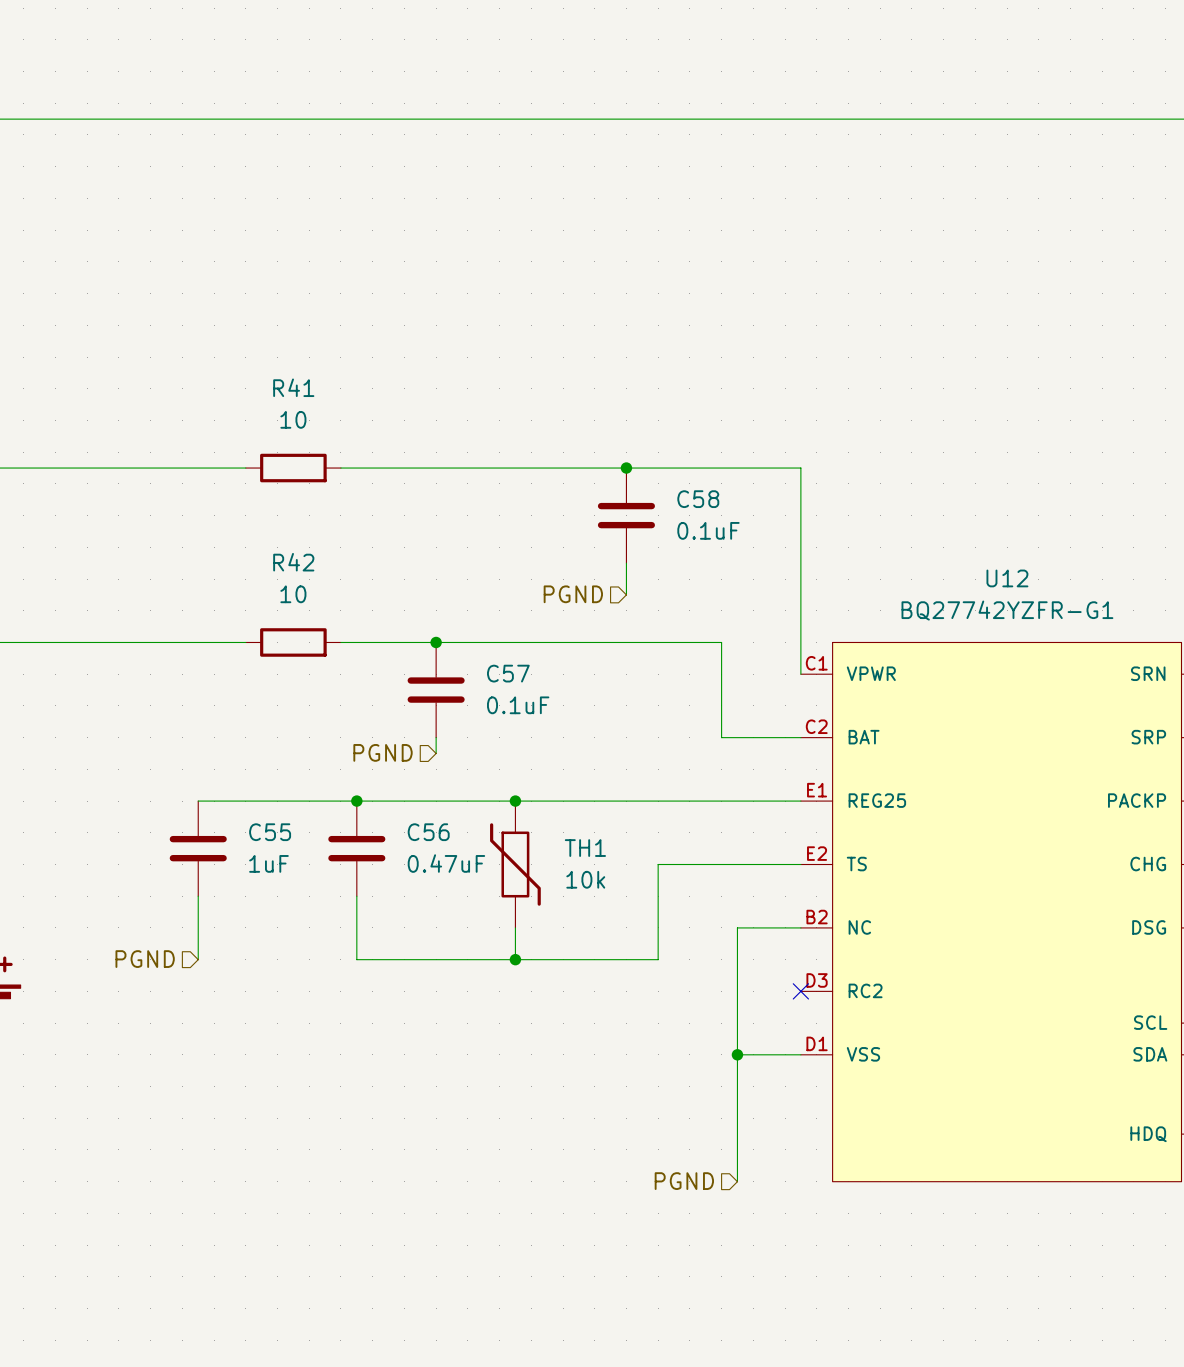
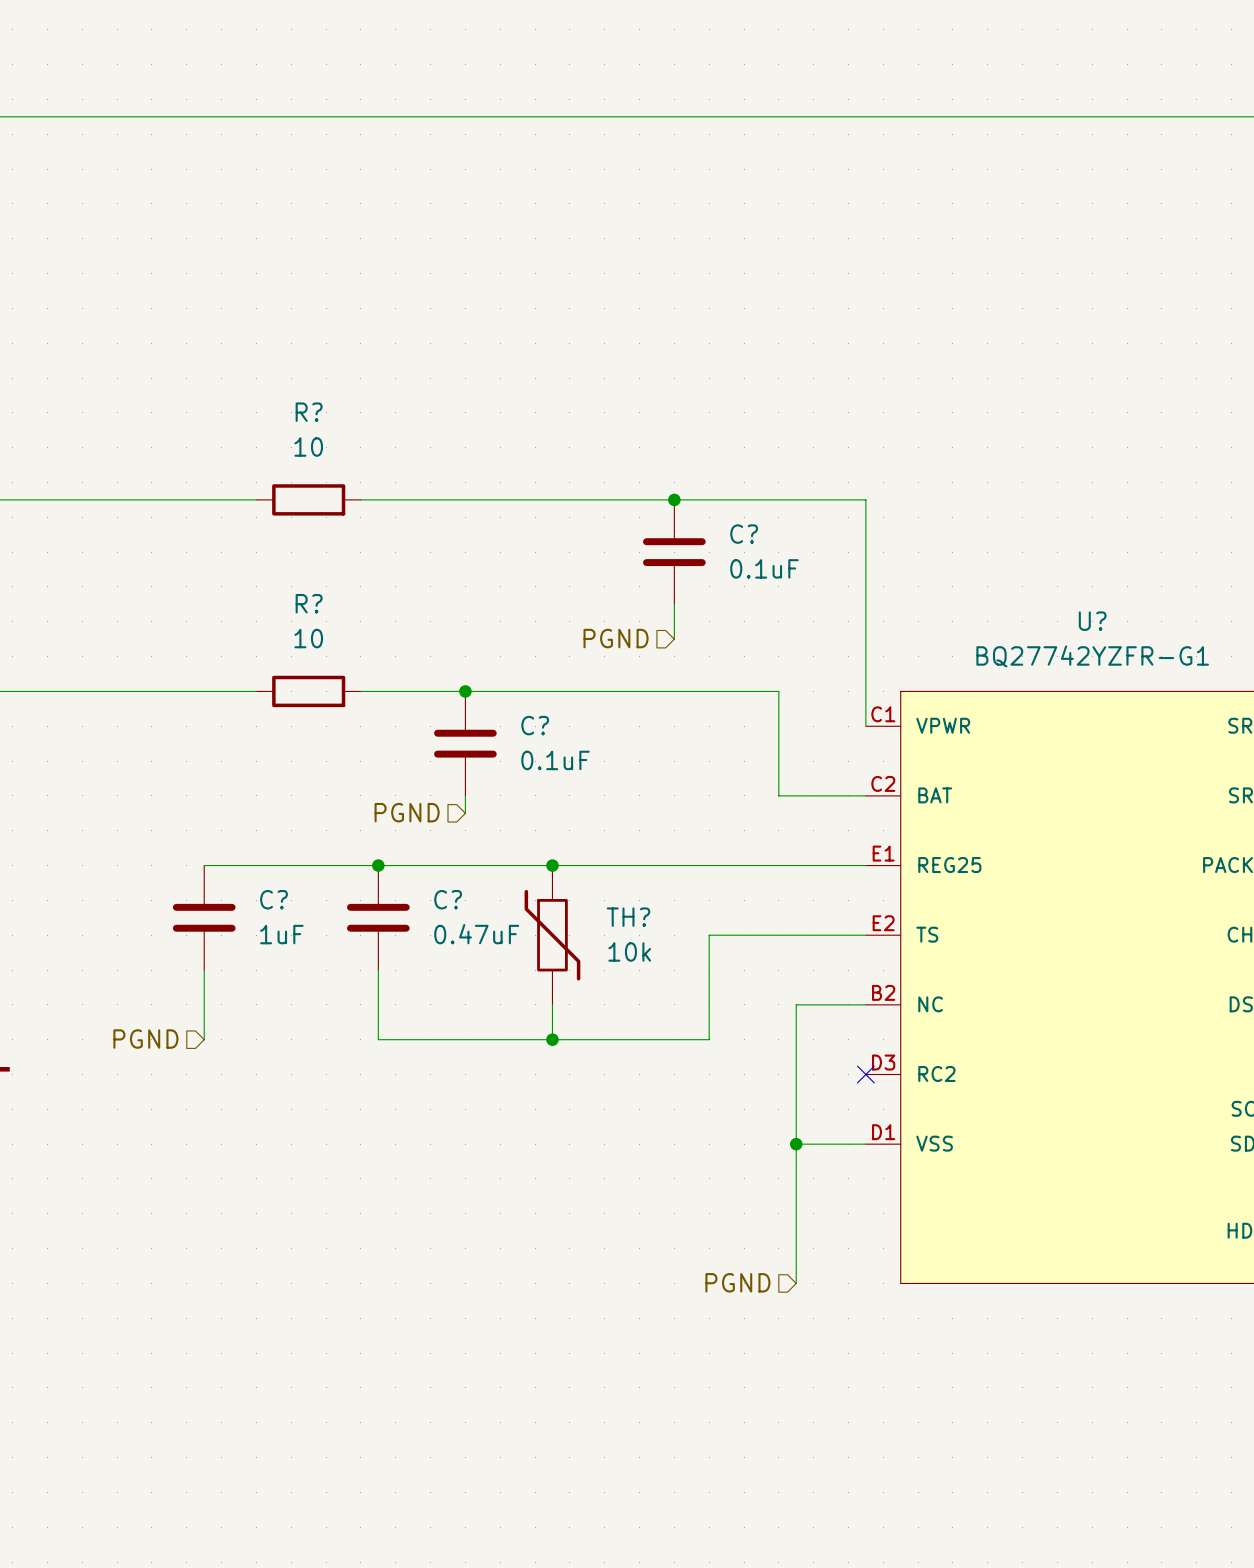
R41 name: R41 (293, 387) -> R? (309, 412)
C58 name: C58 (698, 499) -> C? (744, 534)
R42 name: R42 (293, 562) -> R? (309, 603)
U12 name: U12 (1007, 578) -> U? (1092, 621)
C57 name: C57 (508, 673) -> C? (535, 725)
C55 name: C55 (270, 832) -> C? (274, 899)
C56 name: C56 (428, 832) -> C? (448, 899)
TH1 name: TH1 (585, 848) -> TH? (628, 917)

